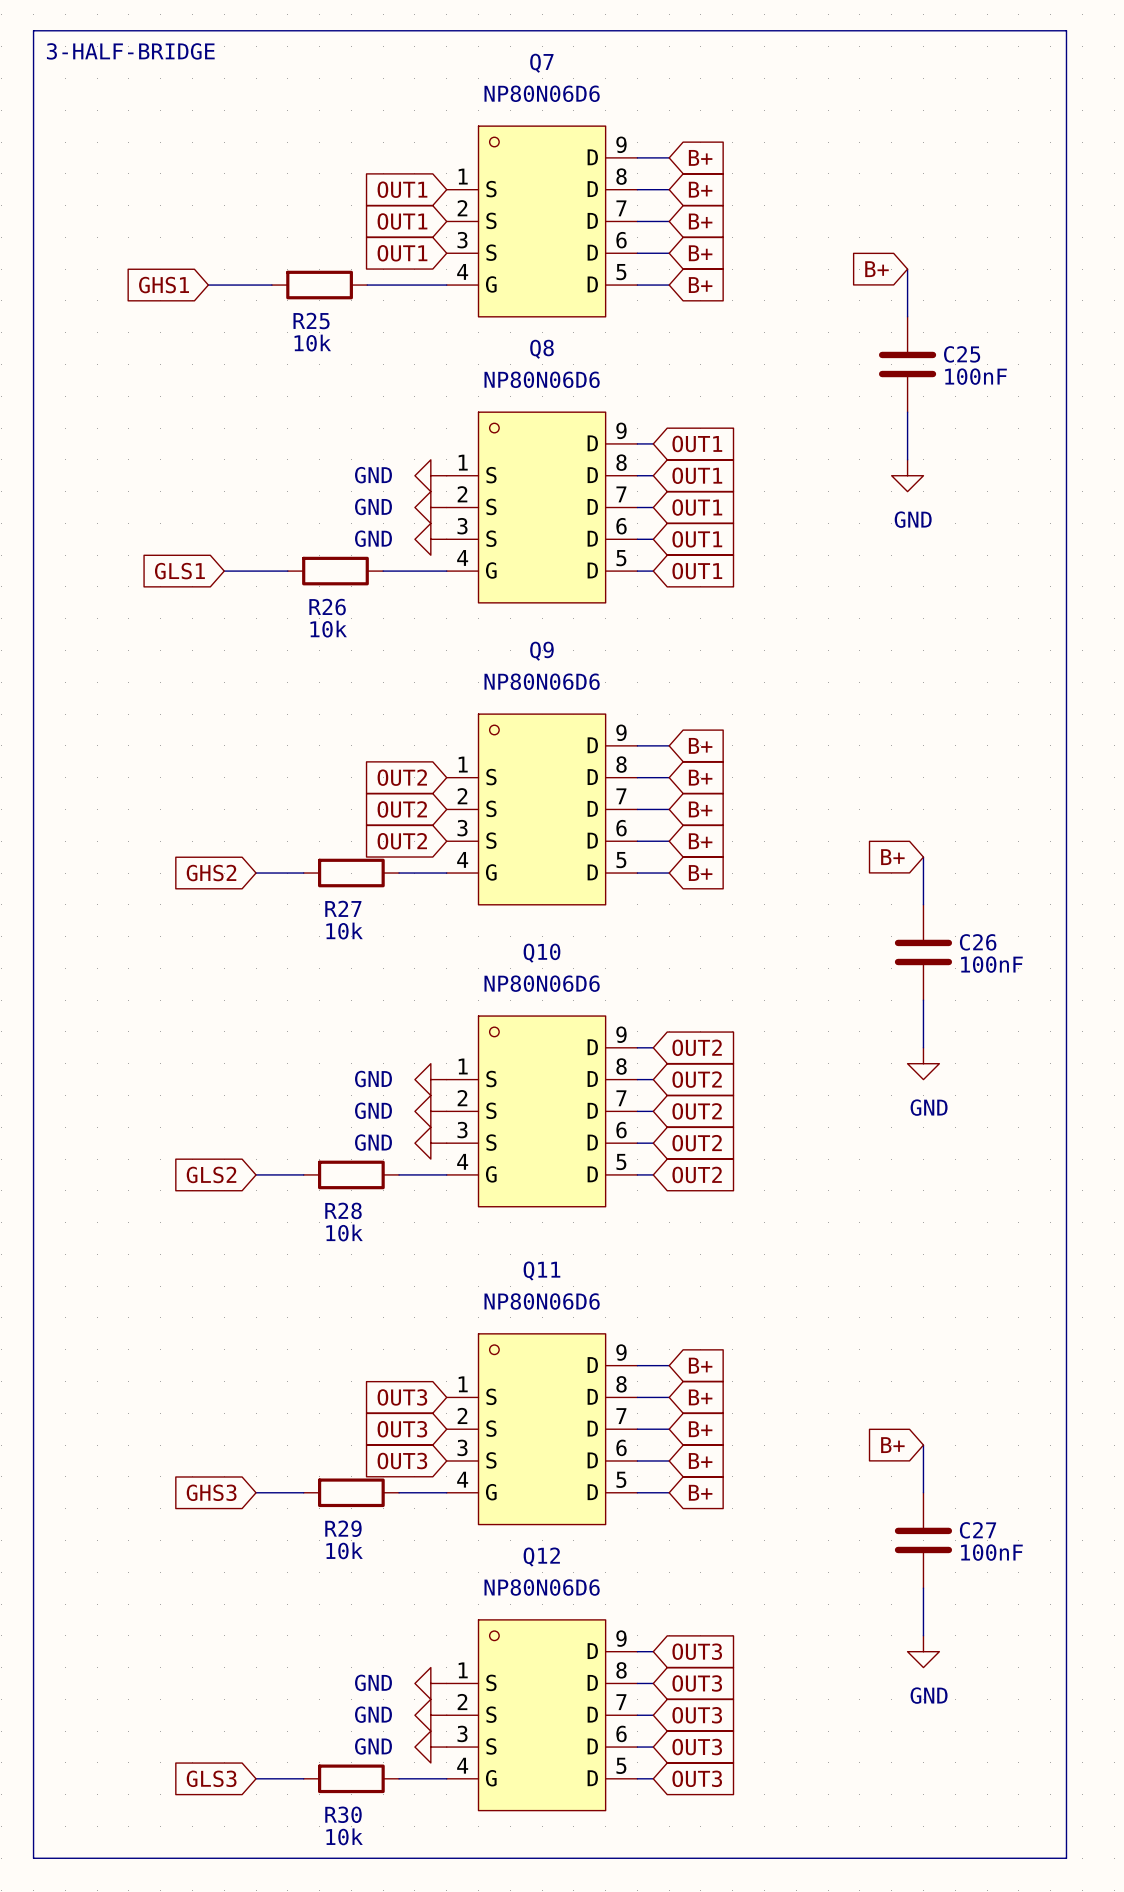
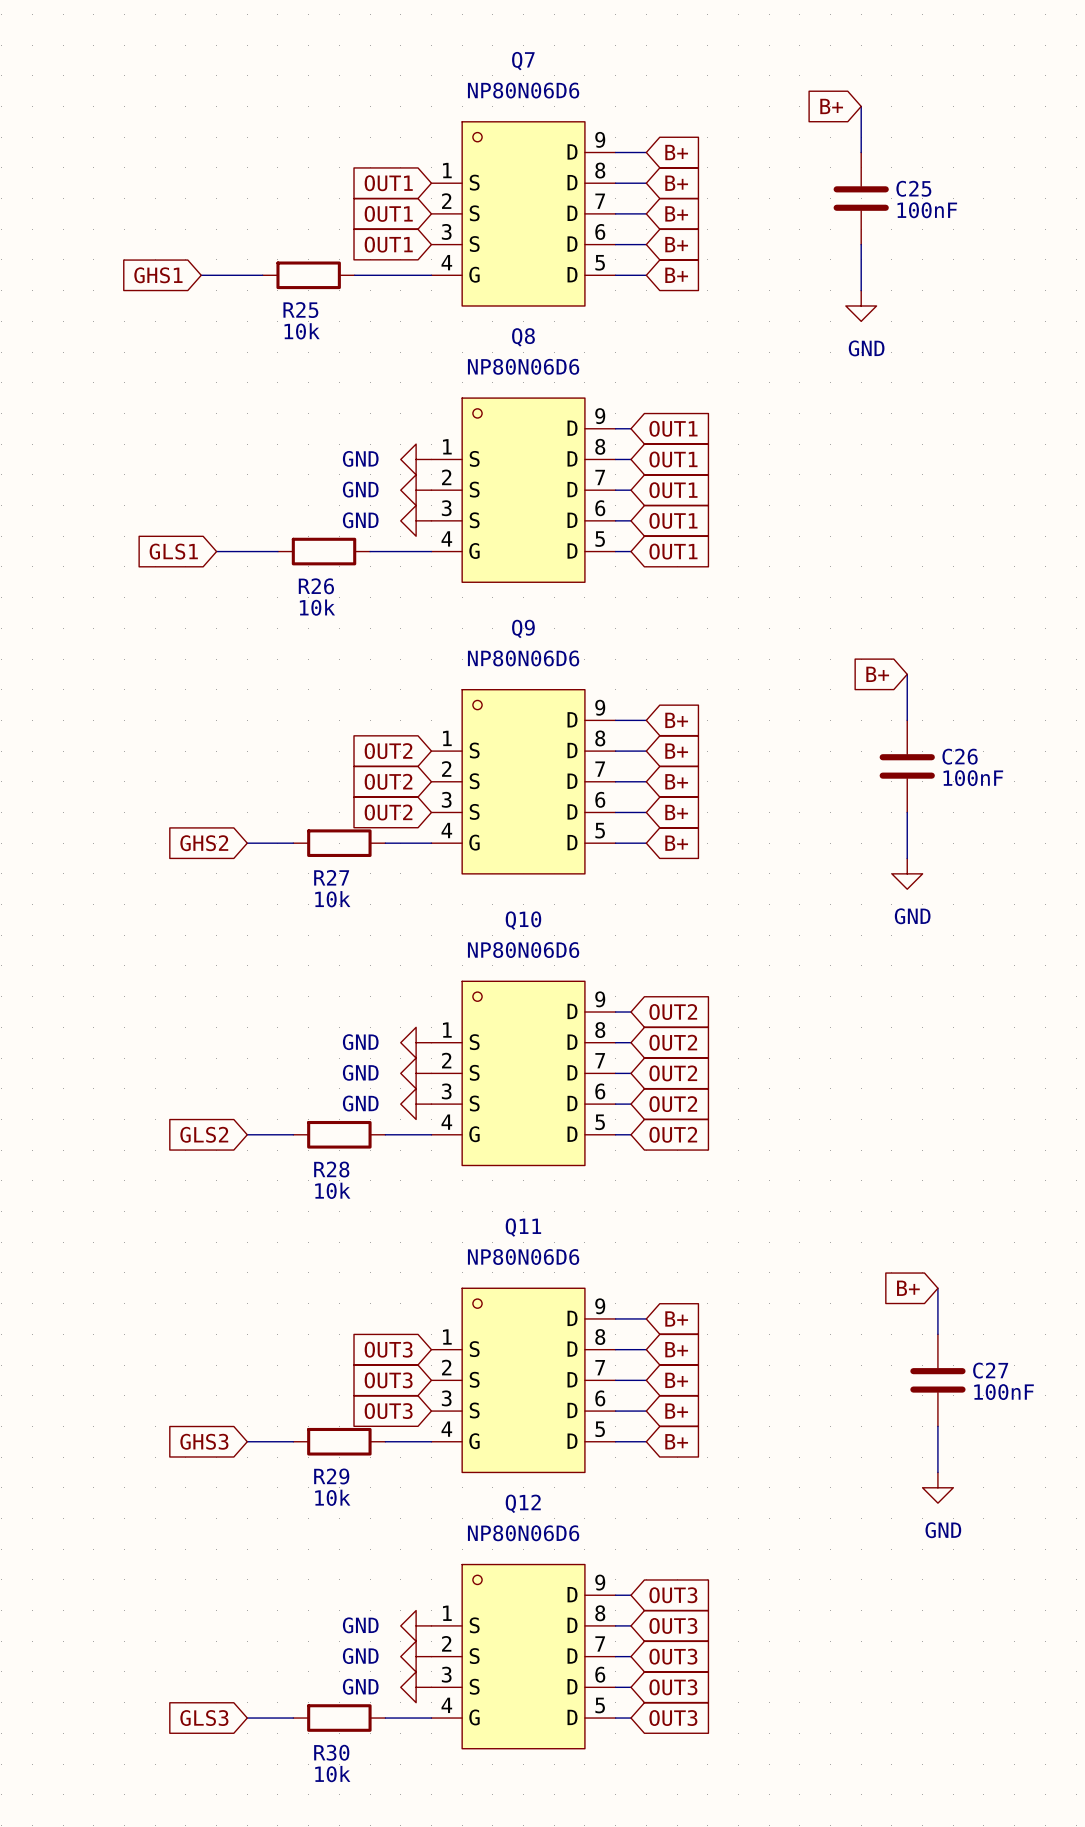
line: (33, 30) (1066, 30) (1066, 1858) (33, 1858) (33, 30) -> none
text: 3-HALF-BRIDGE (130, 51) -> none
global label position: B+ (876, 269) -> B+ (831, 106)
wire: (907, 269) (907, 316) -> (861, 106) (861, 152)
C25 position: (907, 364) -> (861, 198)
wire: (907, 412) (907, 459) -> (861, 244) (861, 290)
power symbol position: GND (907, 475) -> GND (861, 305)
global label position: B+ (892, 857) -> B+ (877, 674)
wire: (923, 857) (923, 904) -> (907, 674) (907, 720)
C26 position: (923, 952) -> (907, 766)
wire: (923, 1000) (923, 1047) -> (907, 812) (907, 858)
power symbol position: GND (923, 1063) -> GND (907, 873)
global label position: B+ (892, 1445) -> B+ (908, 1288)
wire: (923, 1445) (923, 1492) -> (937, 1288) (937, 1334)
C27 position: (923, 1540) -> (937, 1380)
wire: (923, 1588) (923, 1635) -> (937, 1426) (937, 1472)
power symbol position: GND (923, 1651) -> GND (937, 1487)

